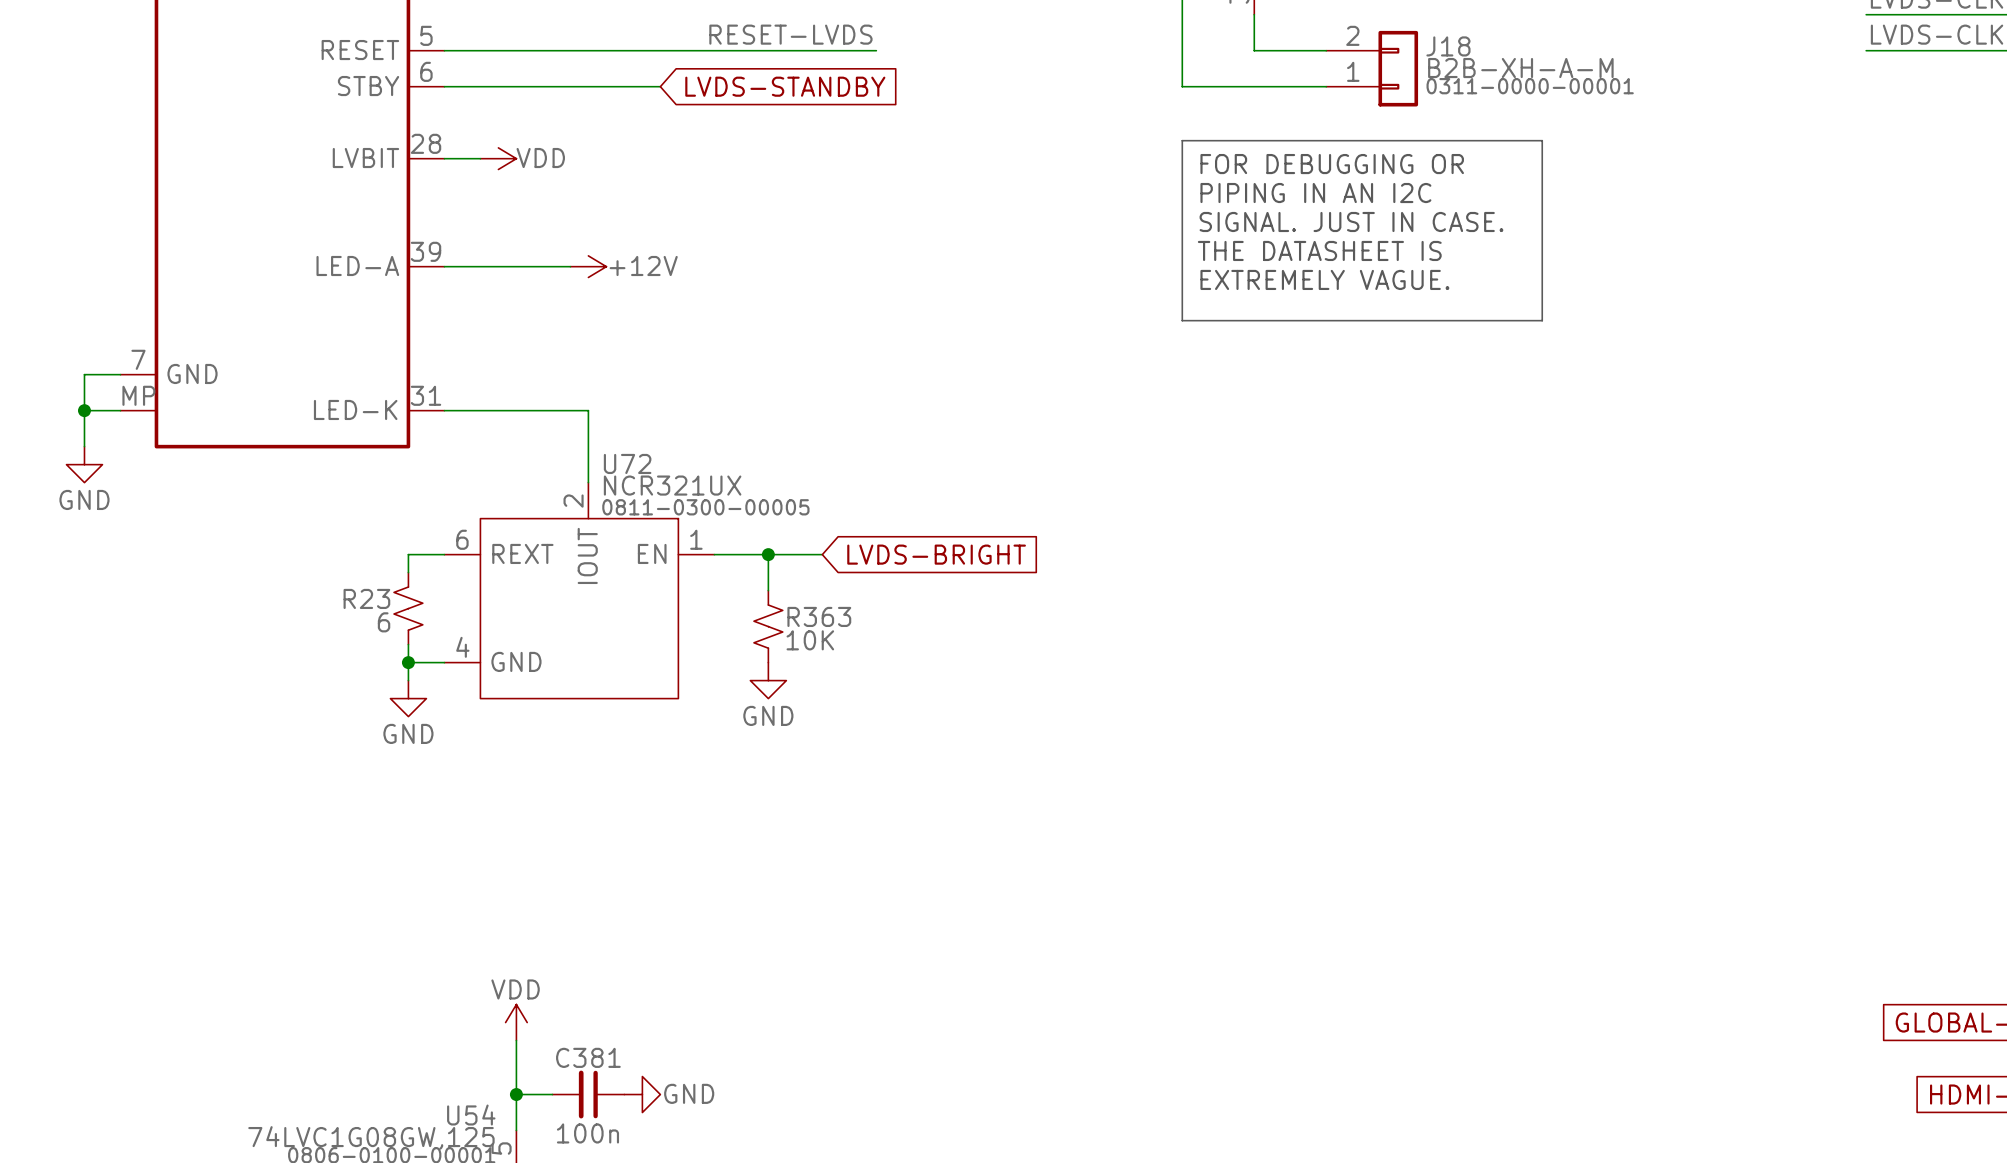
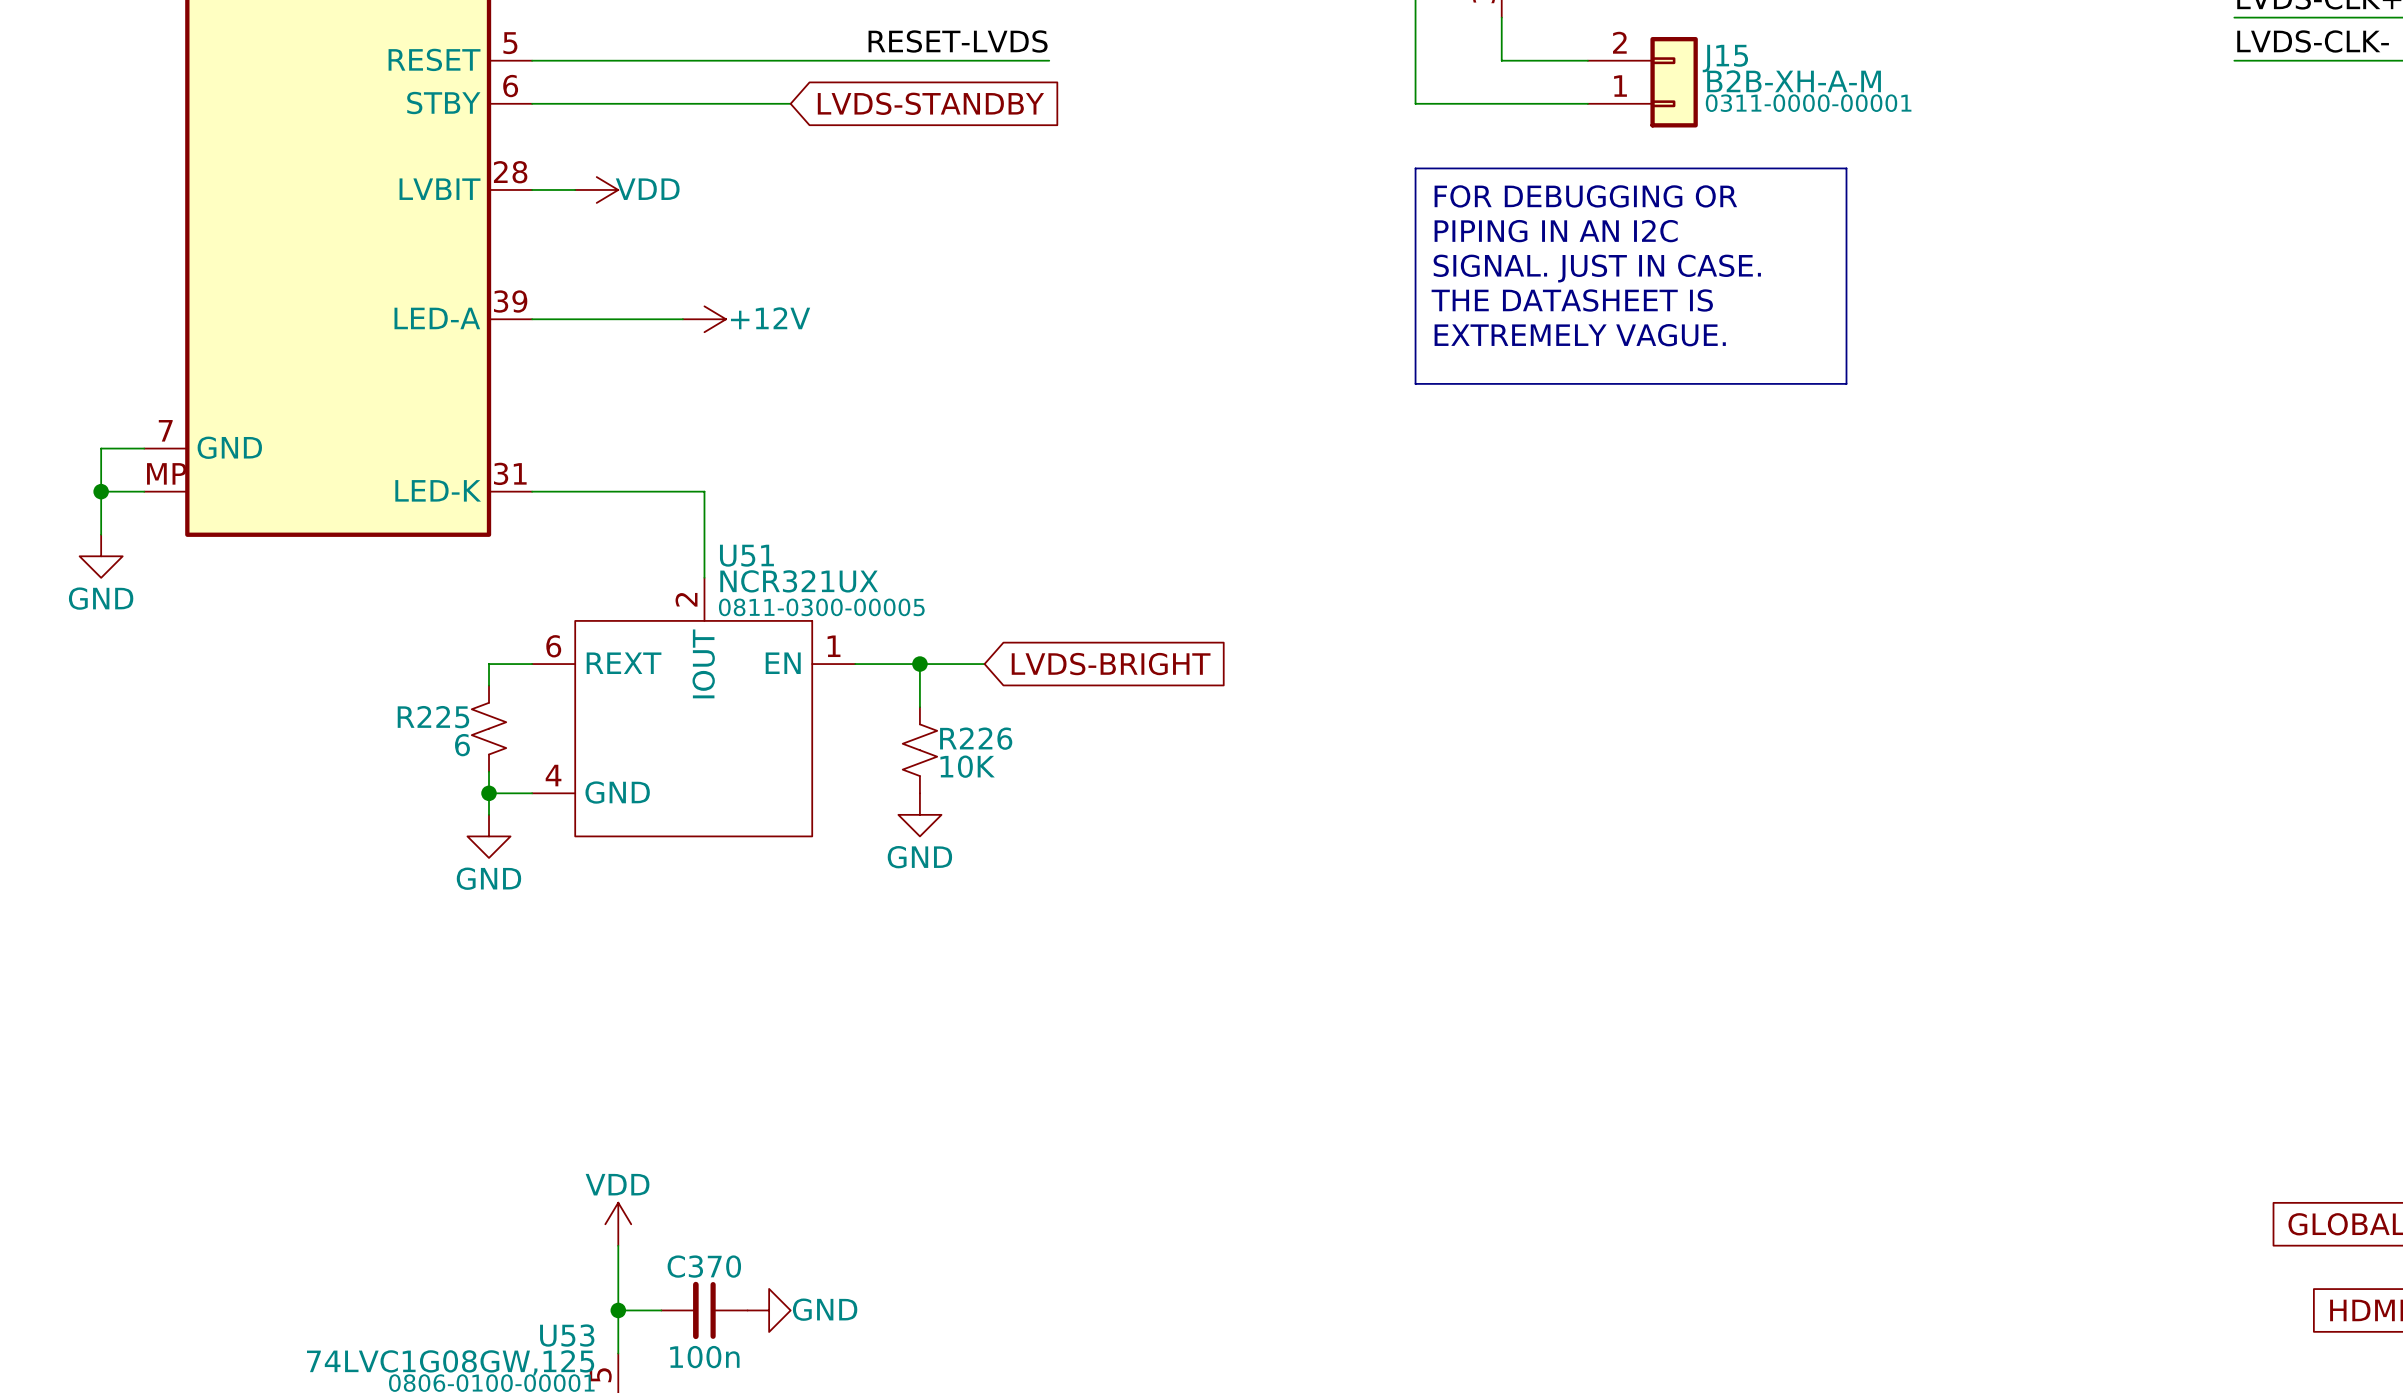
J18 name: J18 (1448, 46) -> J15 (1725, 58)
U72 name: U72 (627, 463) -> U51 (746, 555)
R23 name: R23 (366, 598) -> R225 (433, 717)
R363 name: R363 (819, 616) -> R226 (976, 738)
C381 name: C381 (588, 1057) -> C370 (704, 1266)
U54 name: U54 (471, 1115) -> U53 (567, 1335)

